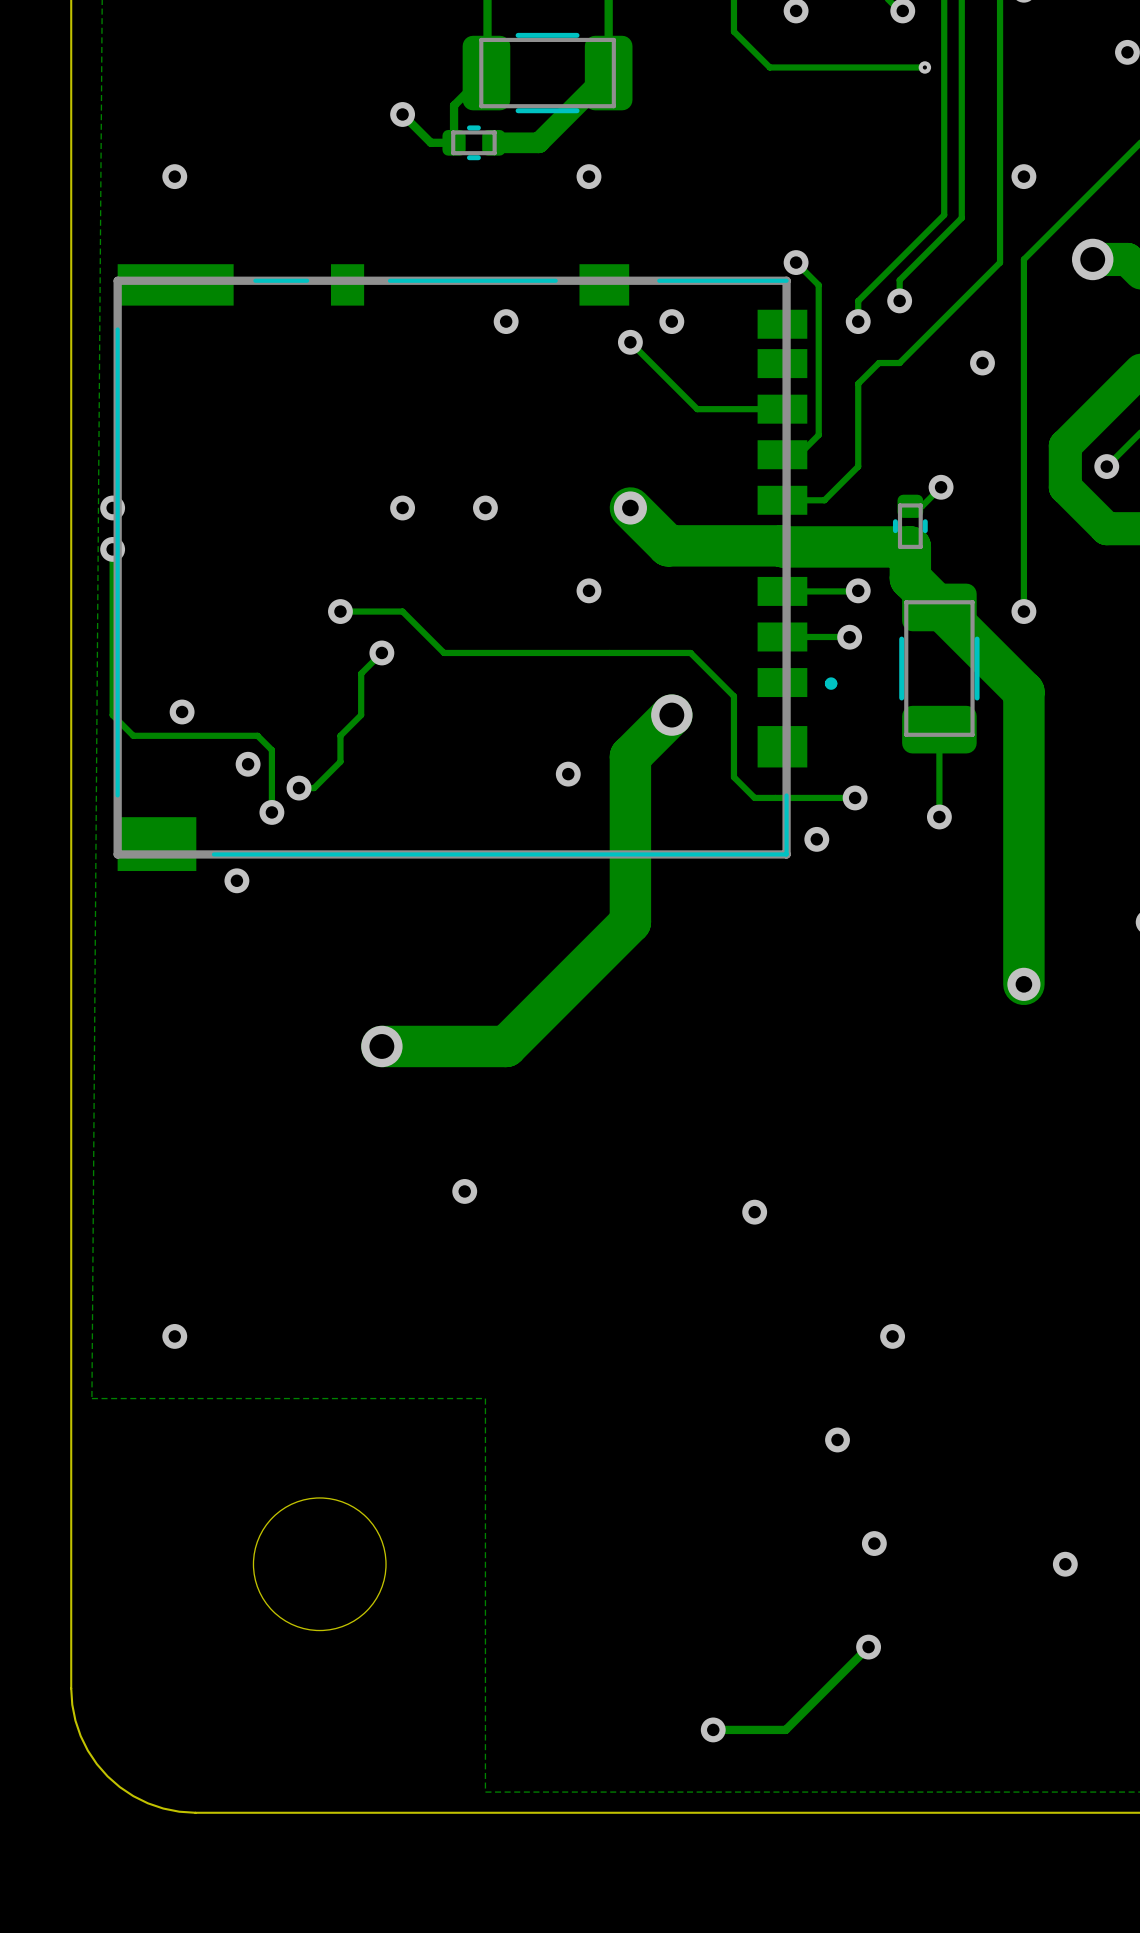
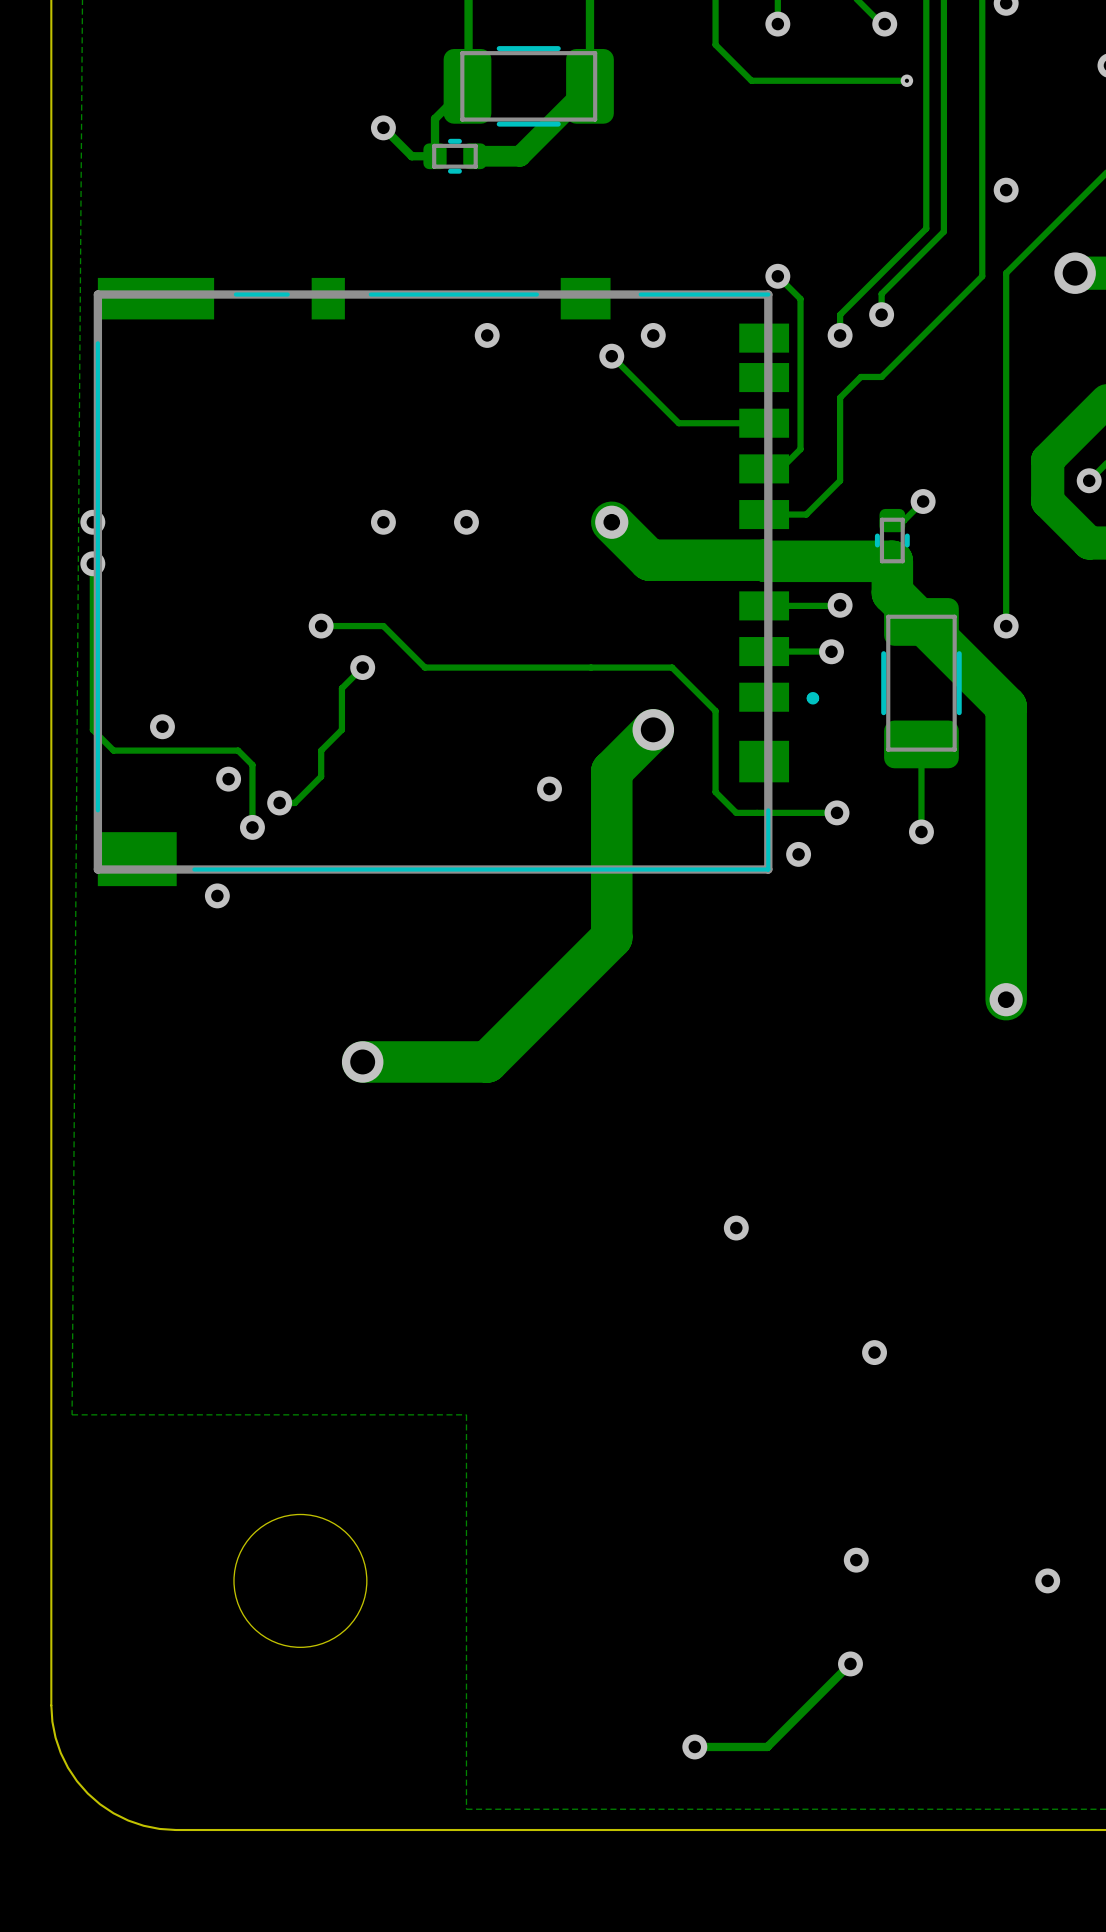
via: (174, 176) -> none
via: (588, 176) -> none
via: (982, 363) -> none
via: (588, 590) -> none
via: (464, 1191) -> none
via: (174, 1336) -> none
via: (837, 1439) -> none

